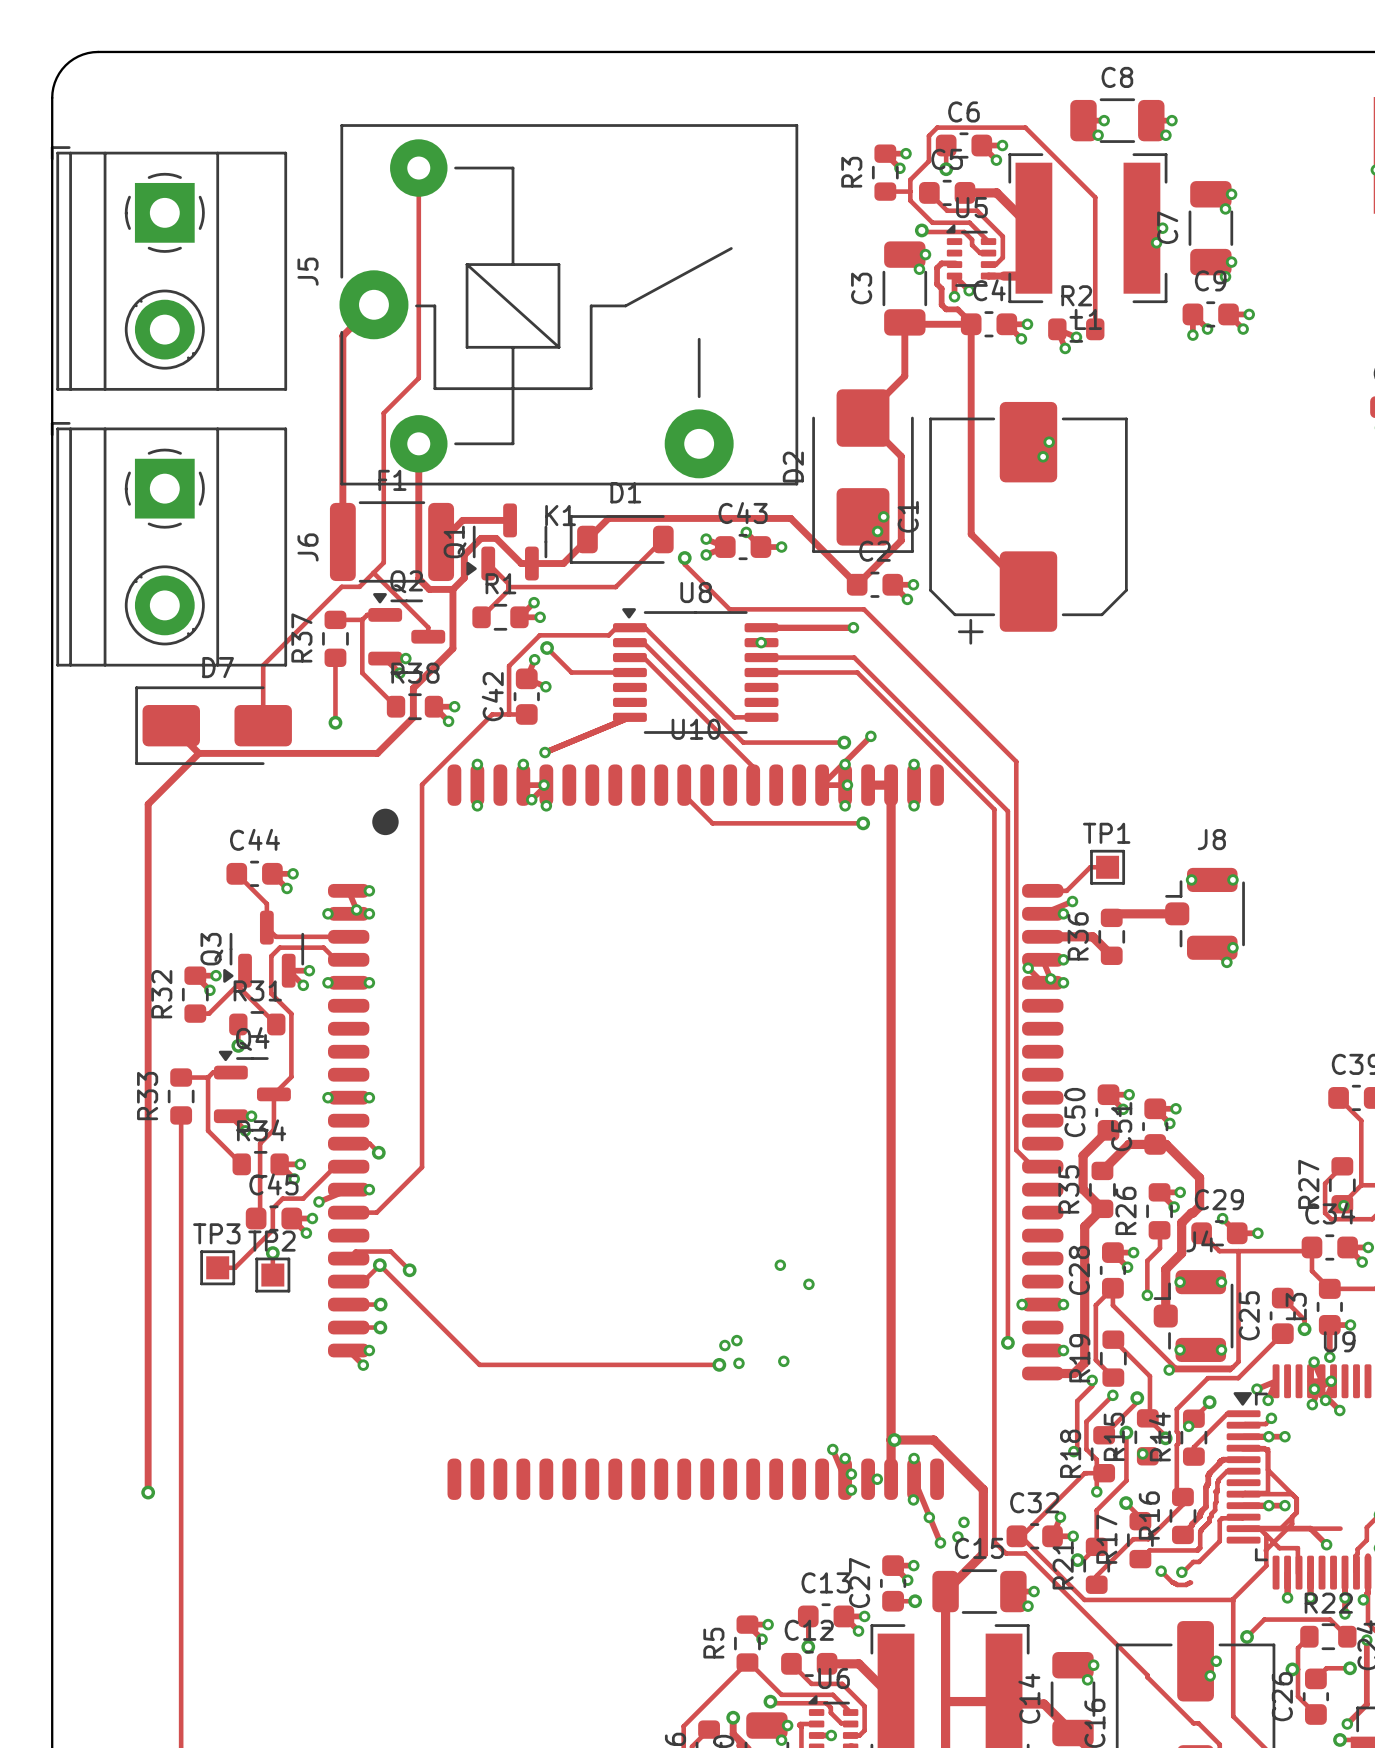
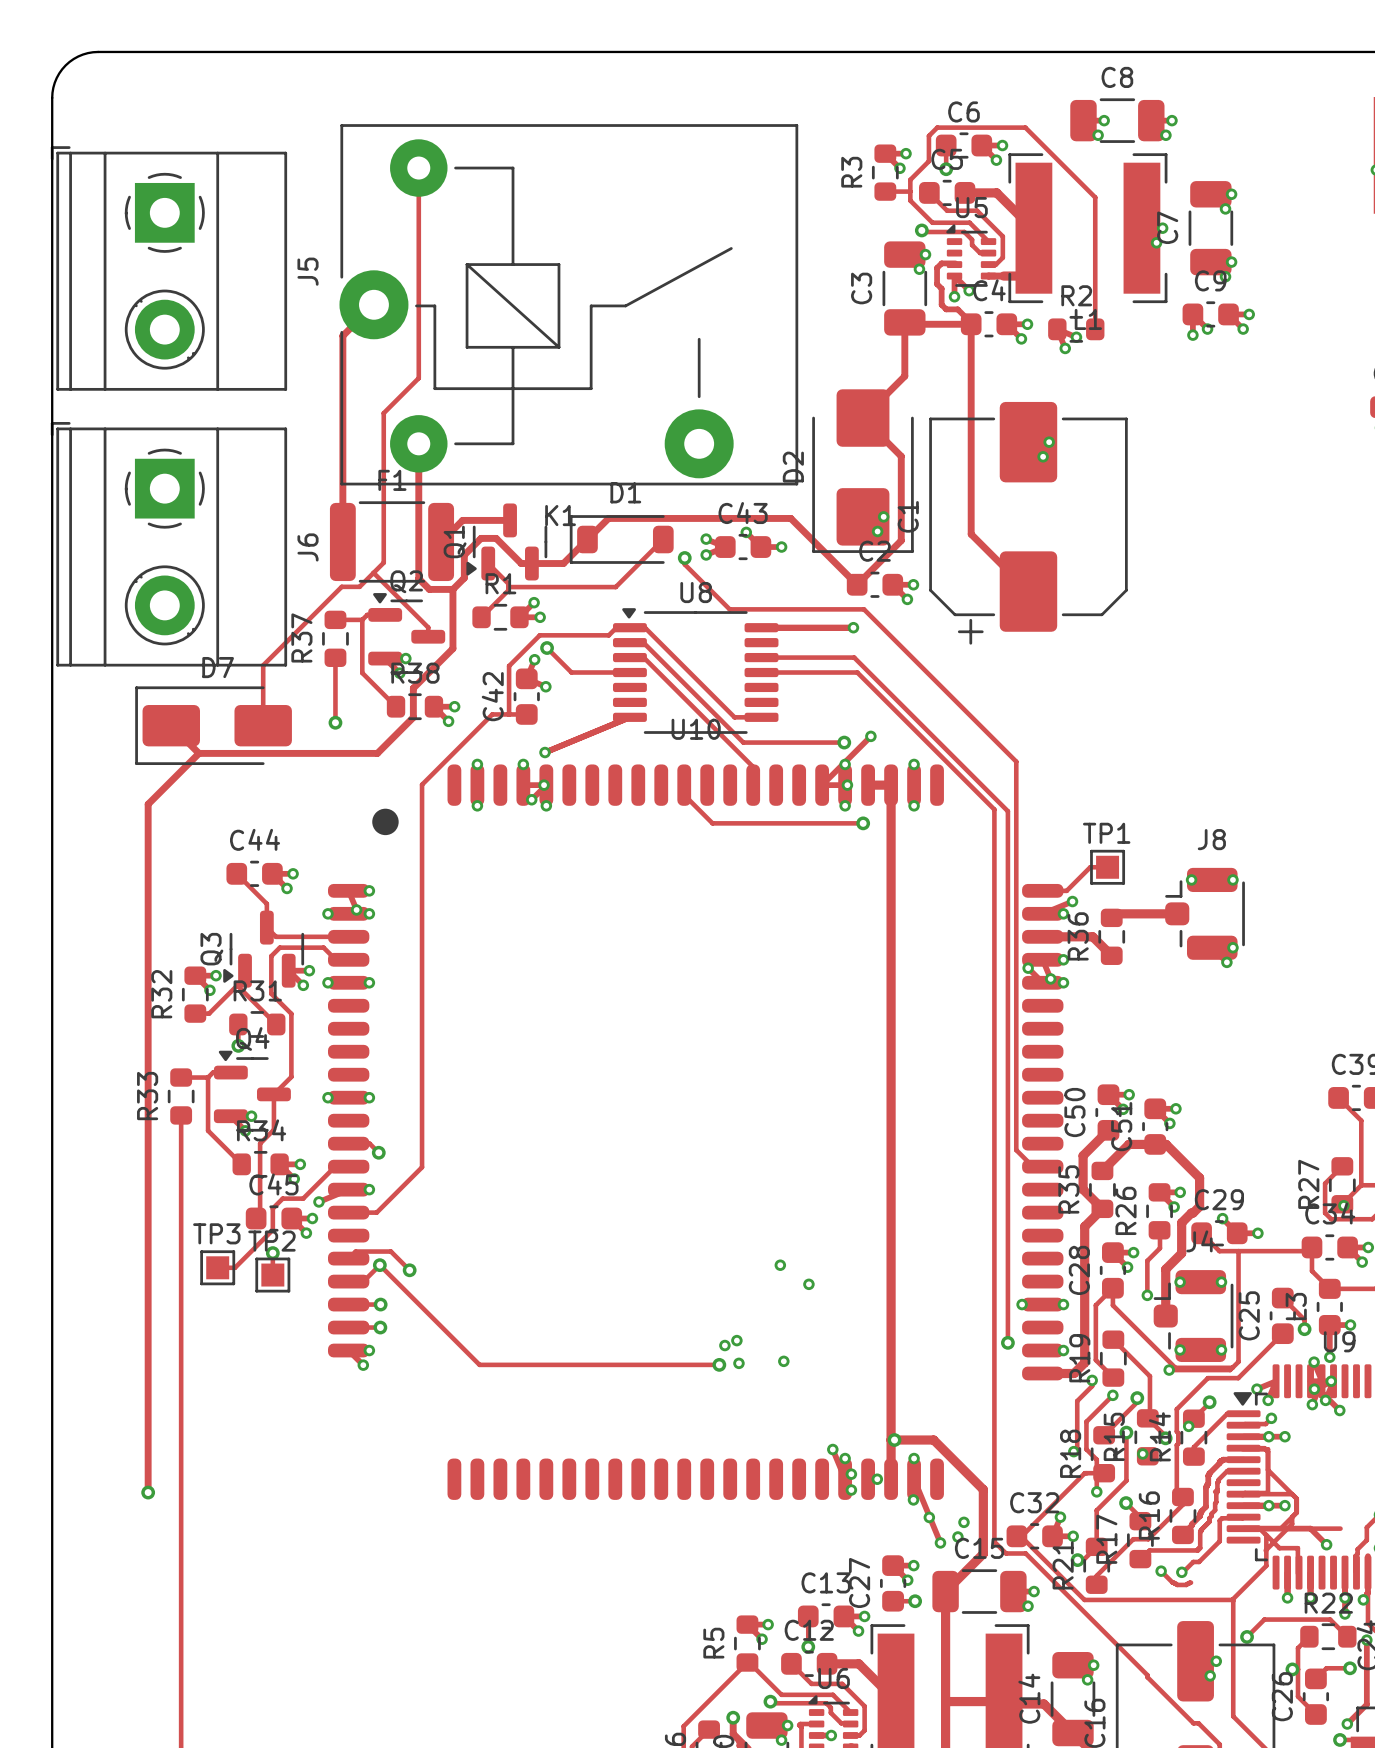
via: (761, 642) -> none

